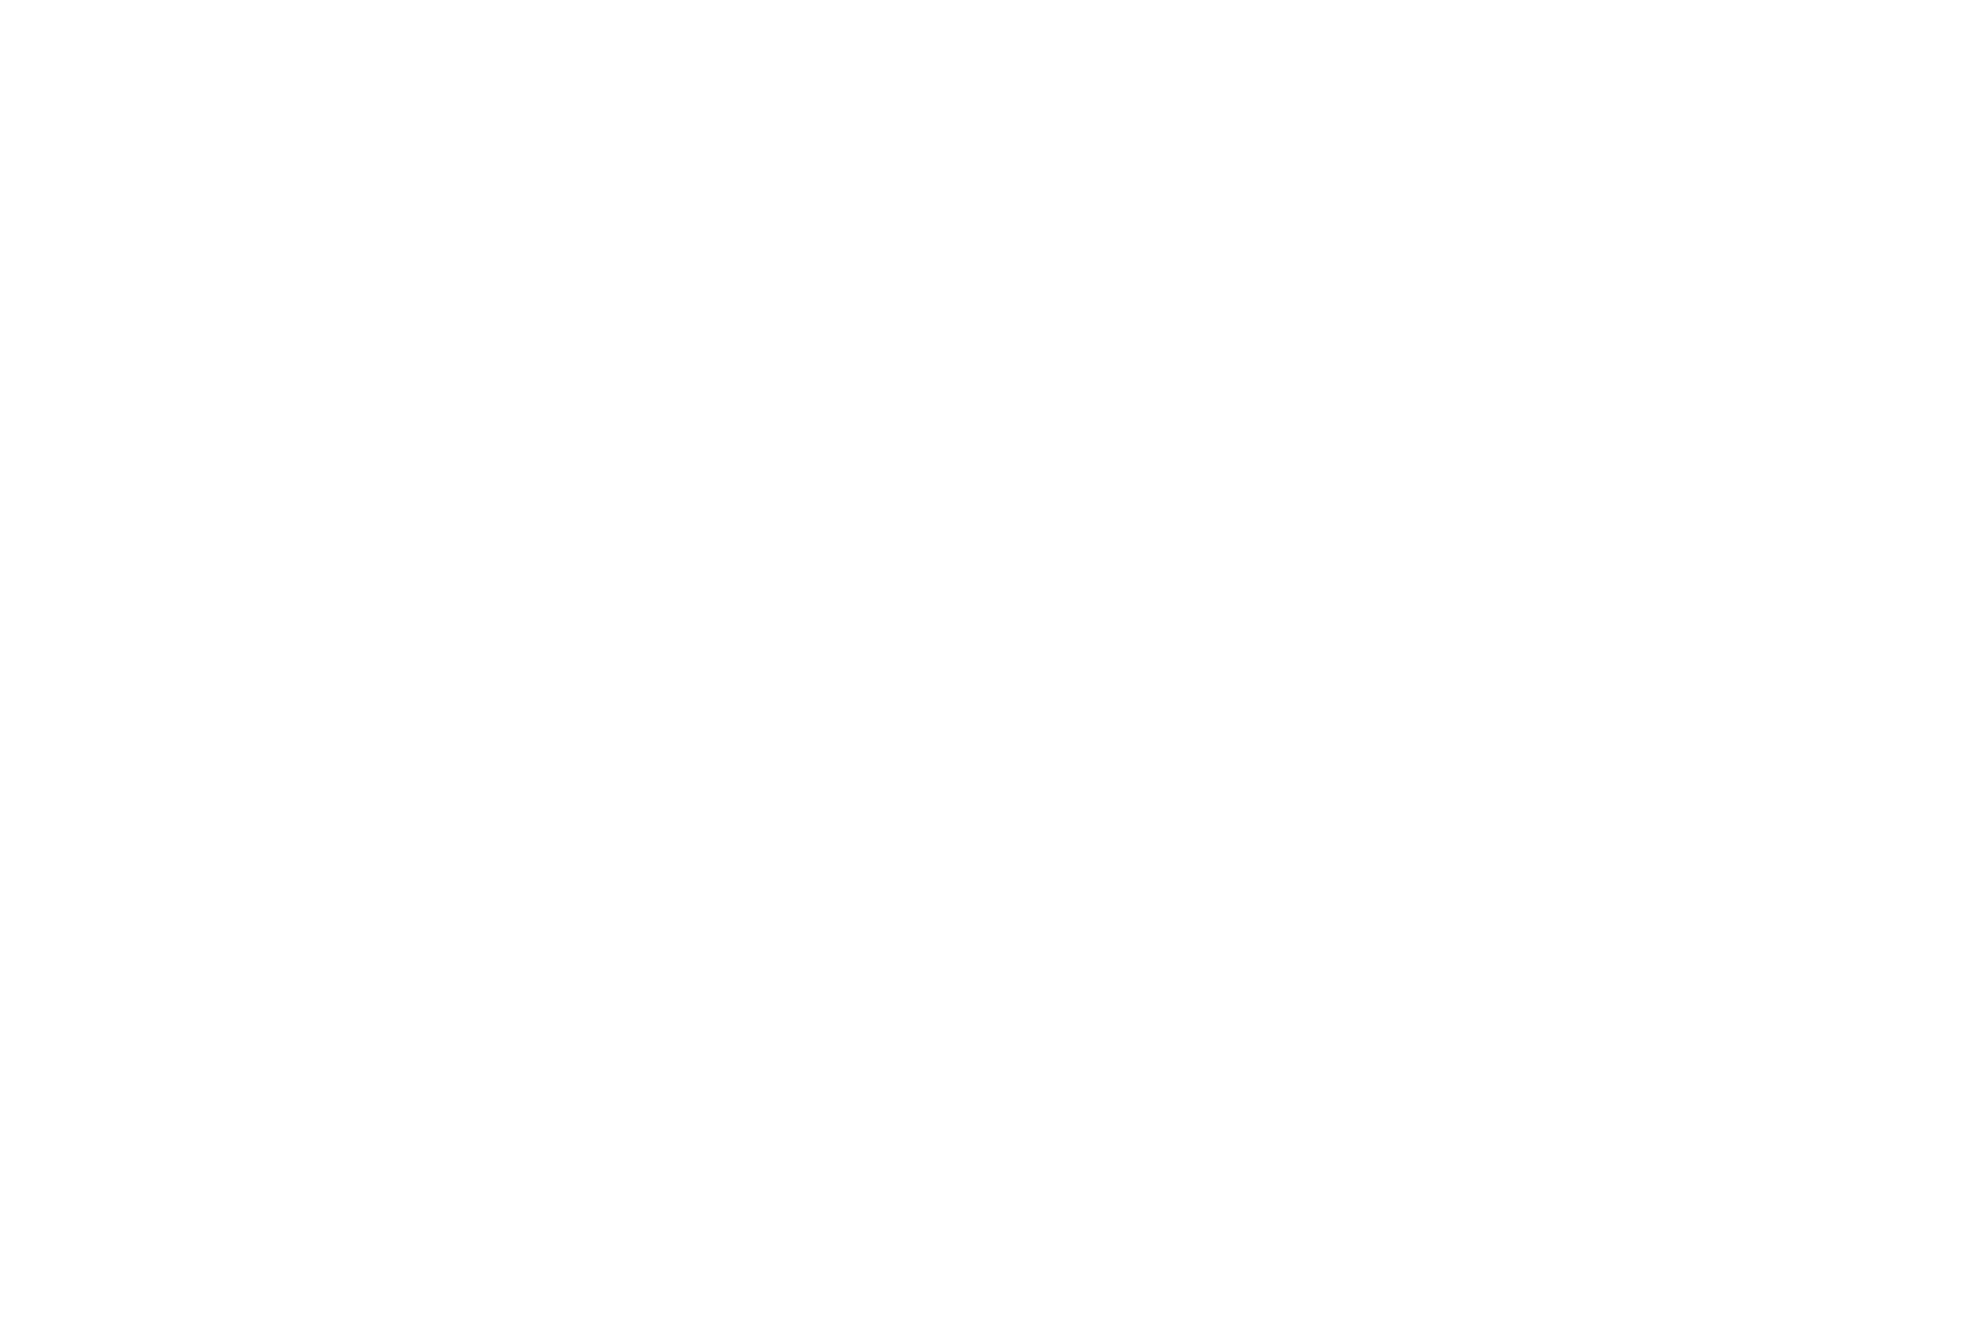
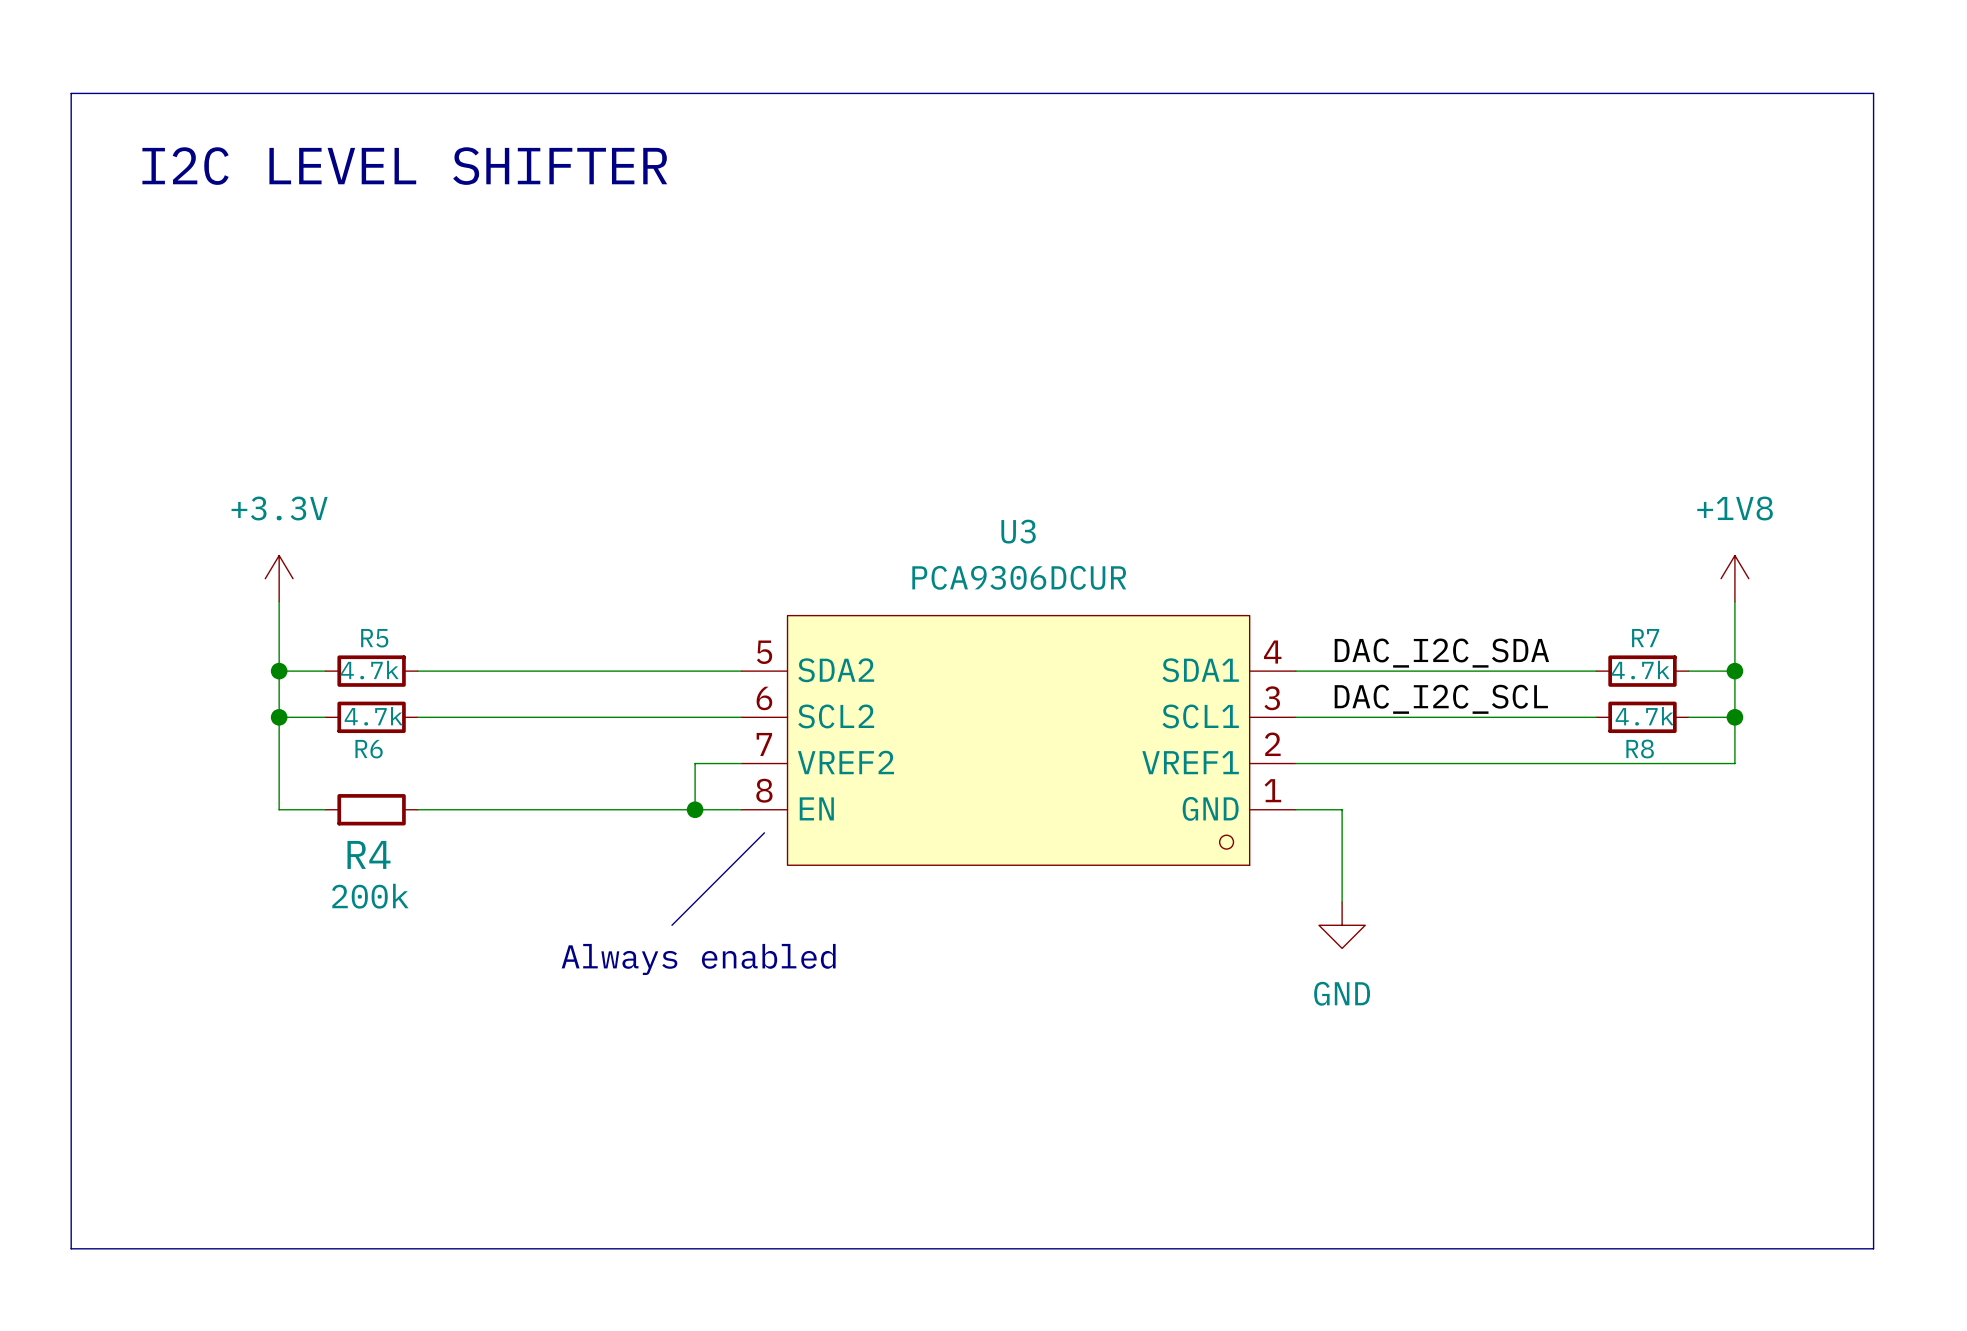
line: none -> (71, 93) (1873, 93) (1873, 1248) (71, 1248) (71, 93)
text: none -> I2C LEVEL SHIFTER (404, 166)
power symbol: none -> +3.3V (279, 578)
power symbol: none -> +1V8 (1734, 578)
wire: none -> (279, 601) (279, 809) (325, 809)
wire: none -> (1734, 601) (1734, 763) (1295, 763)
label: none -> DAC_I2C_SDA (1441, 653)
wire: none -> (279, 671) (325, 671)
junction: none -> (279, 671)
R5: none -> 4.7k (371, 671)
wire: none -> (417, 671) (741, 671)
wire: none -> (1295, 671) (1596, 671)
R7: none -> 4.7k (1642, 671)
wire: none -> (1688, 671) (1734, 671)
junction: none -> (1734, 671)
label: none -> DAC_I2C_SCL (1441, 699)
wire: none -> (279, 717) (325, 717)
junction: none -> (279, 717)
R6: none -> 4.7k (371, 717)
wire: none -> (417, 717) (741, 717)
wire: none -> (1295, 717) (1596, 717)
R8: none -> 4.7k (1642, 717)
wire: none -> (1688, 717) (1734, 717)
junction: none -> (1734, 717)
U3: none -> PCA9306DCUR (1018, 740)
wire: none -> (741, 763) (695, 763) (695, 809)
R4: none -> 200k (371, 809)
wire: none -> (417, 809) (741, 809)
junction: none -> (695, 809)
wire: none -> (1295, 809) (1342, 809) (1342, 902)
line: none -> (764, 832) (671, 925)
power symbol: none -> GND (1342, 925)
text: none -> Always enabled (698, 959)

